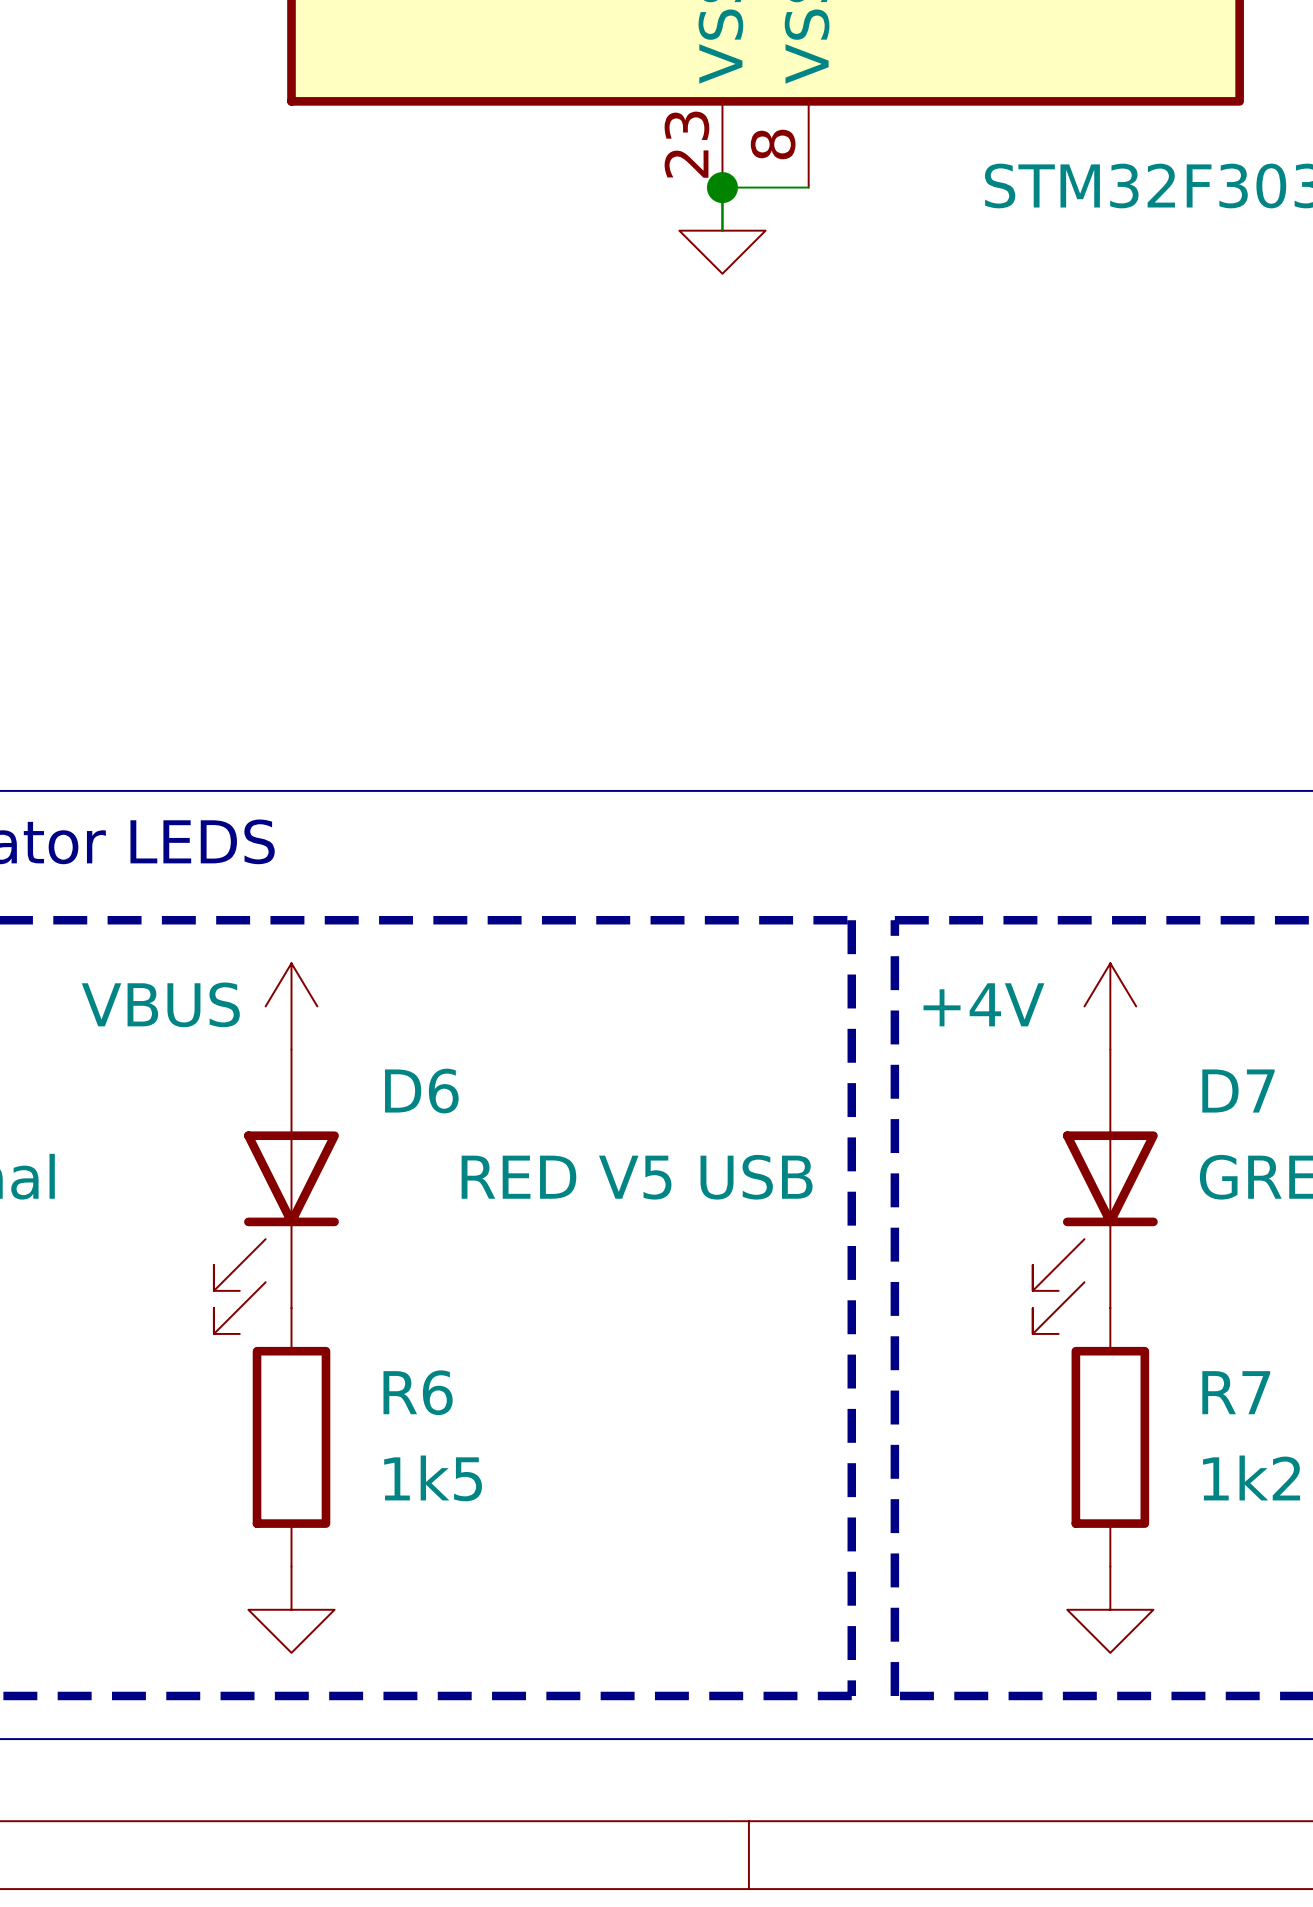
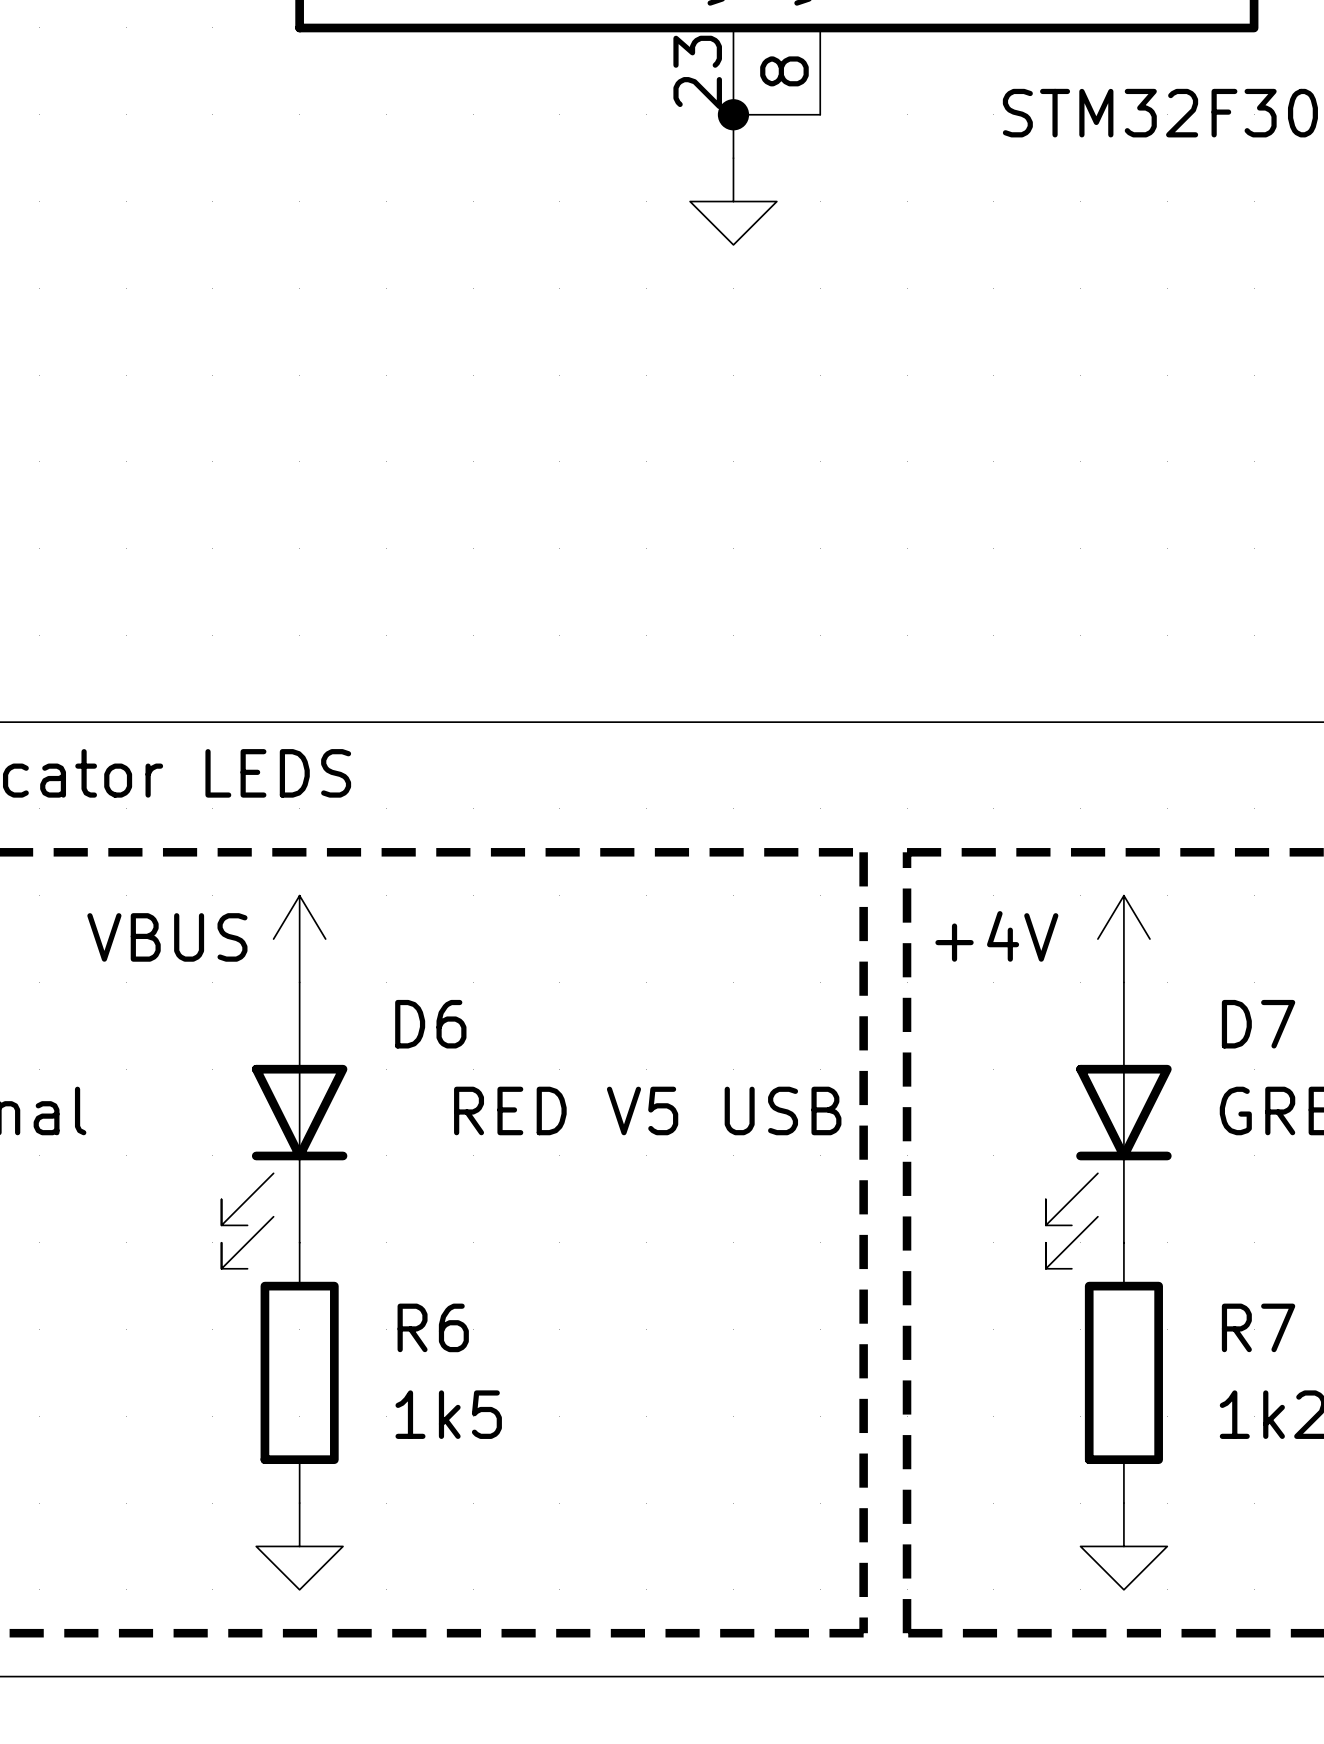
power symbol position: (722, 230) -> (733, 201)

